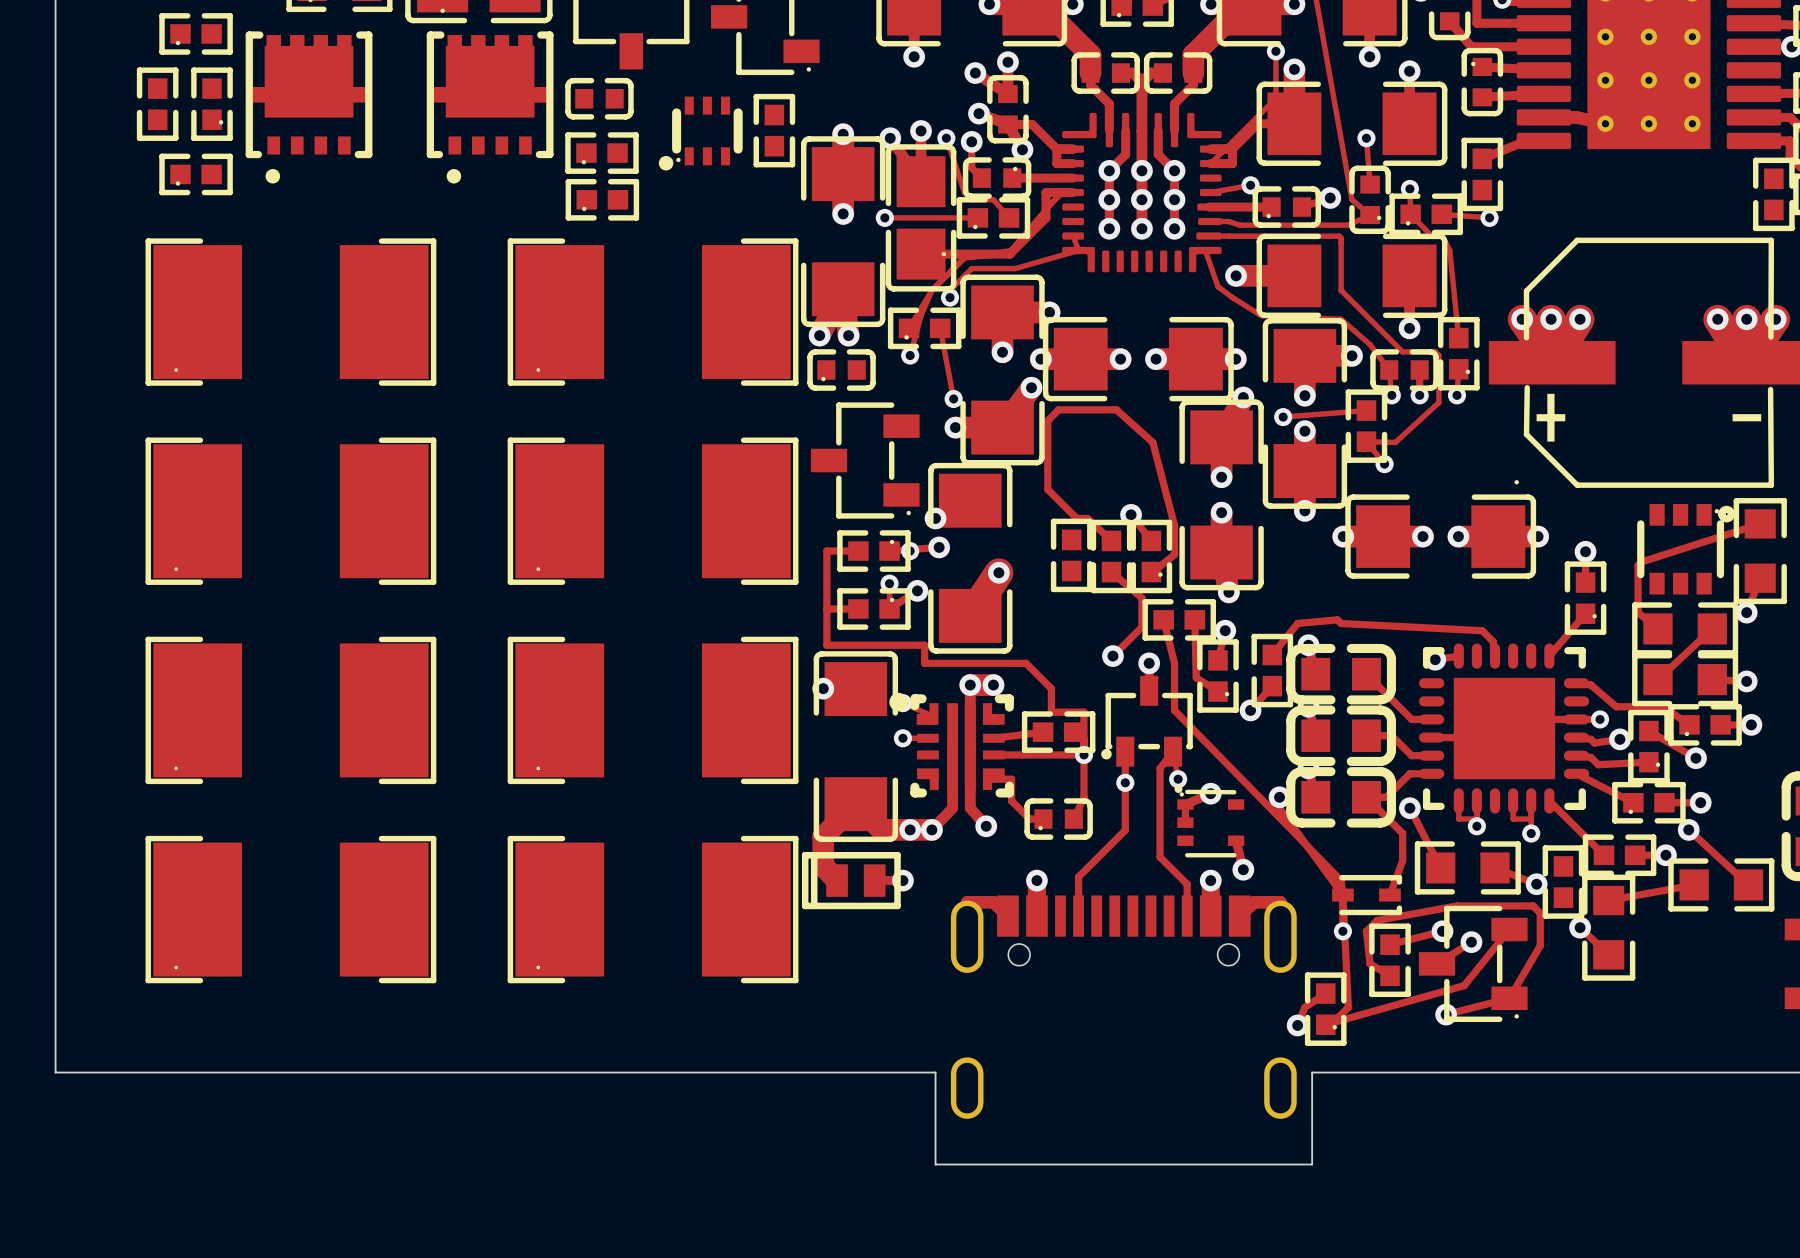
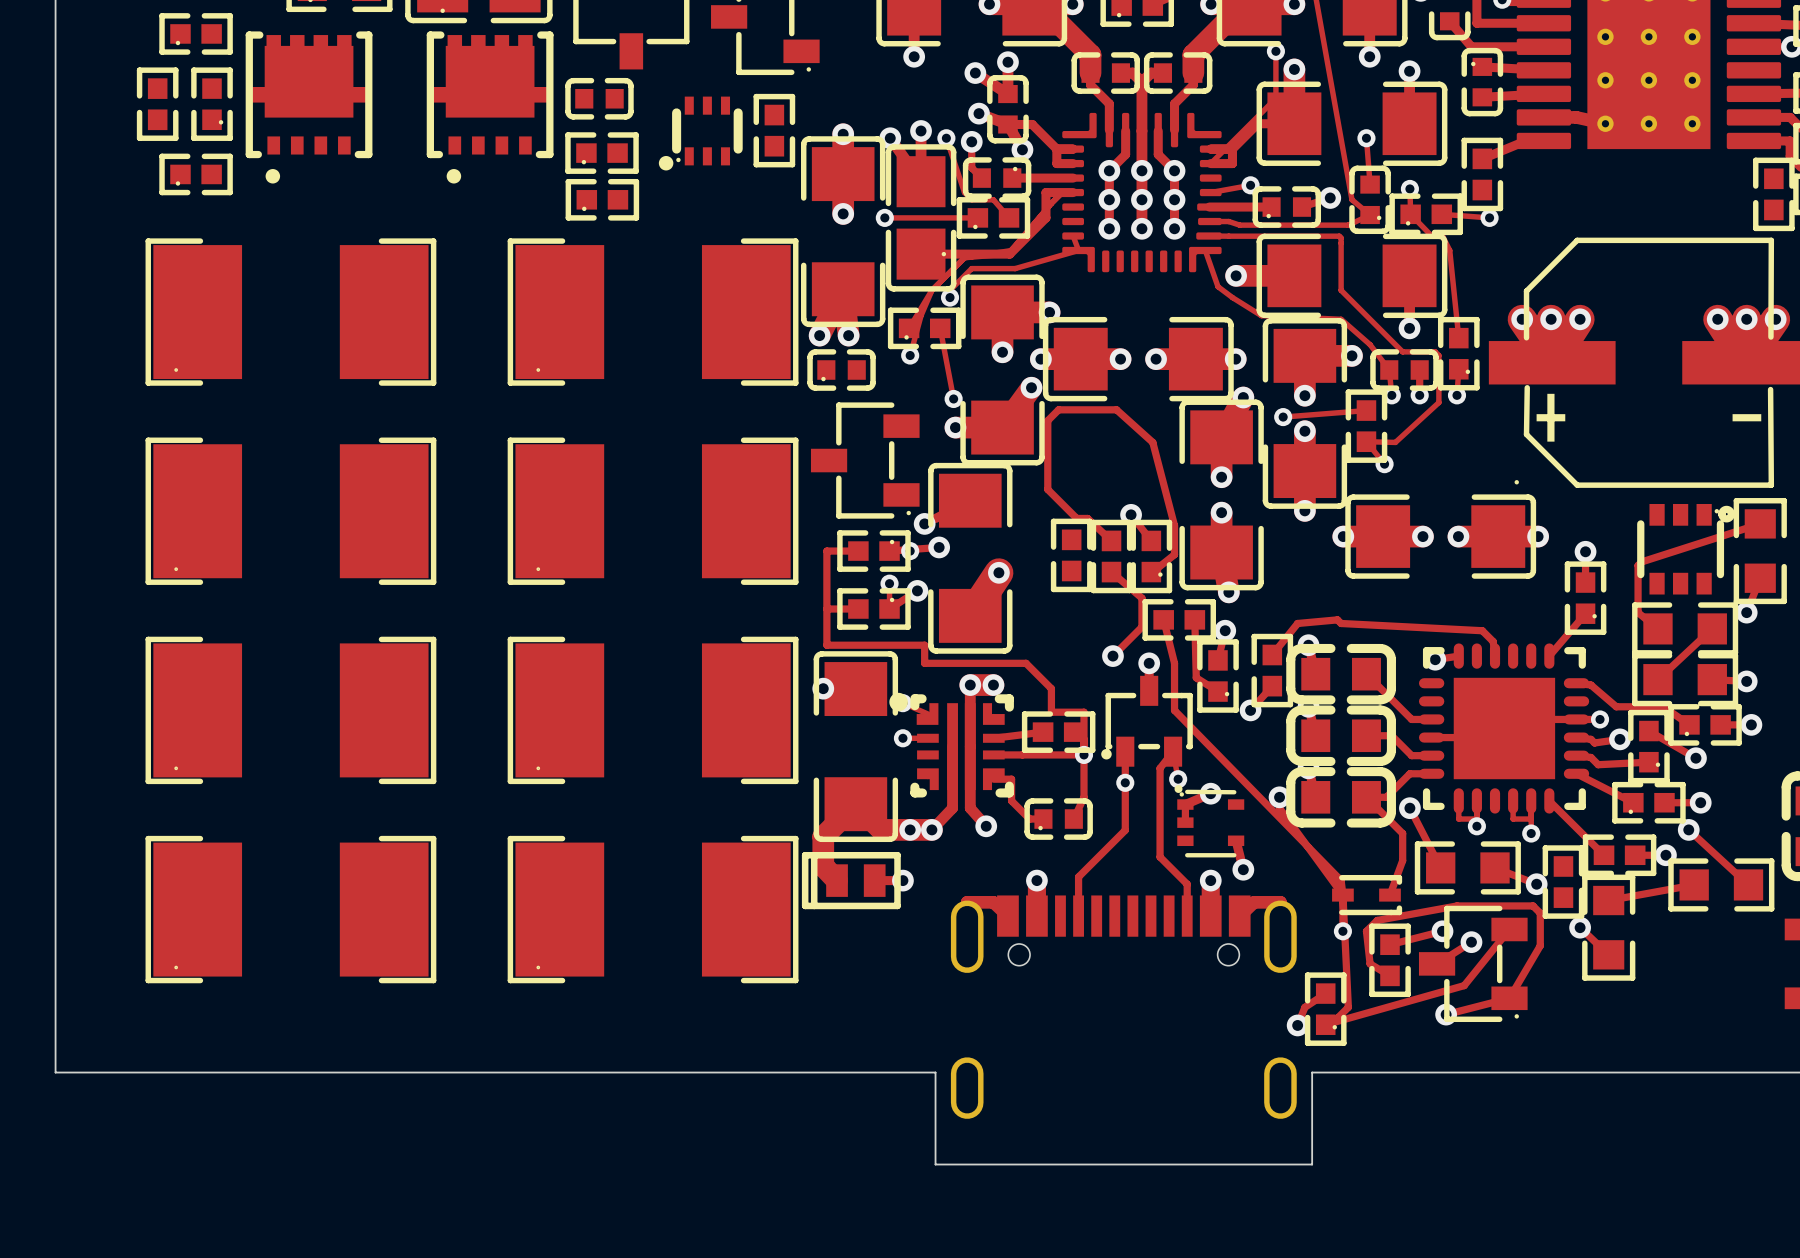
via position: (935, 518) -> (924, 523)

